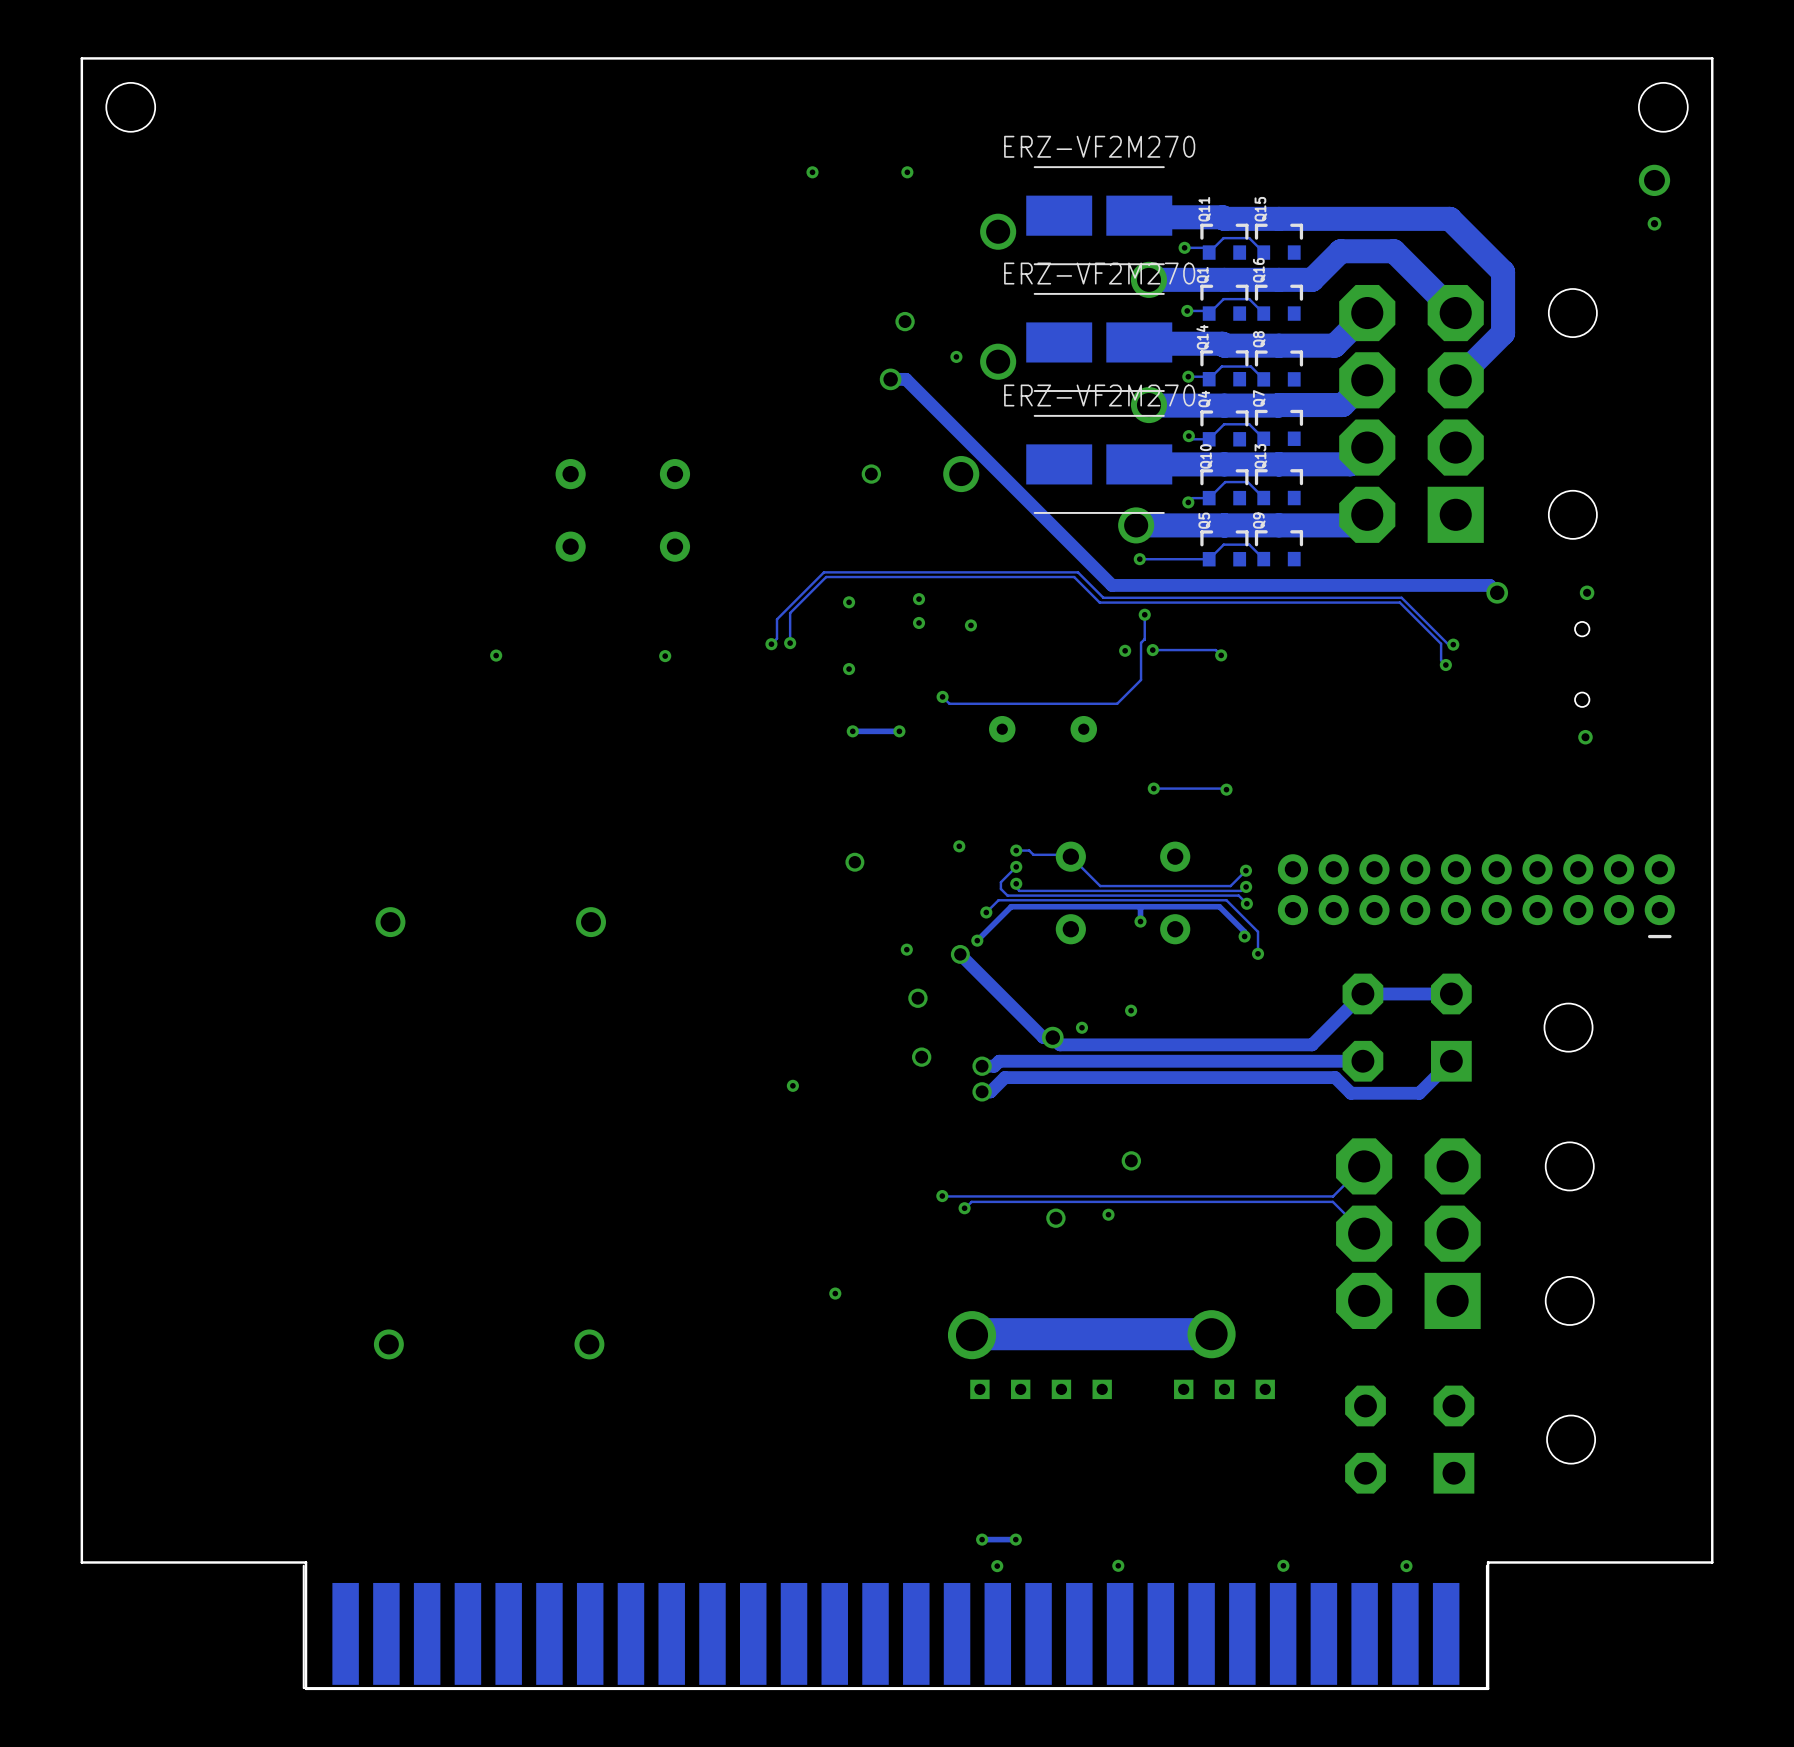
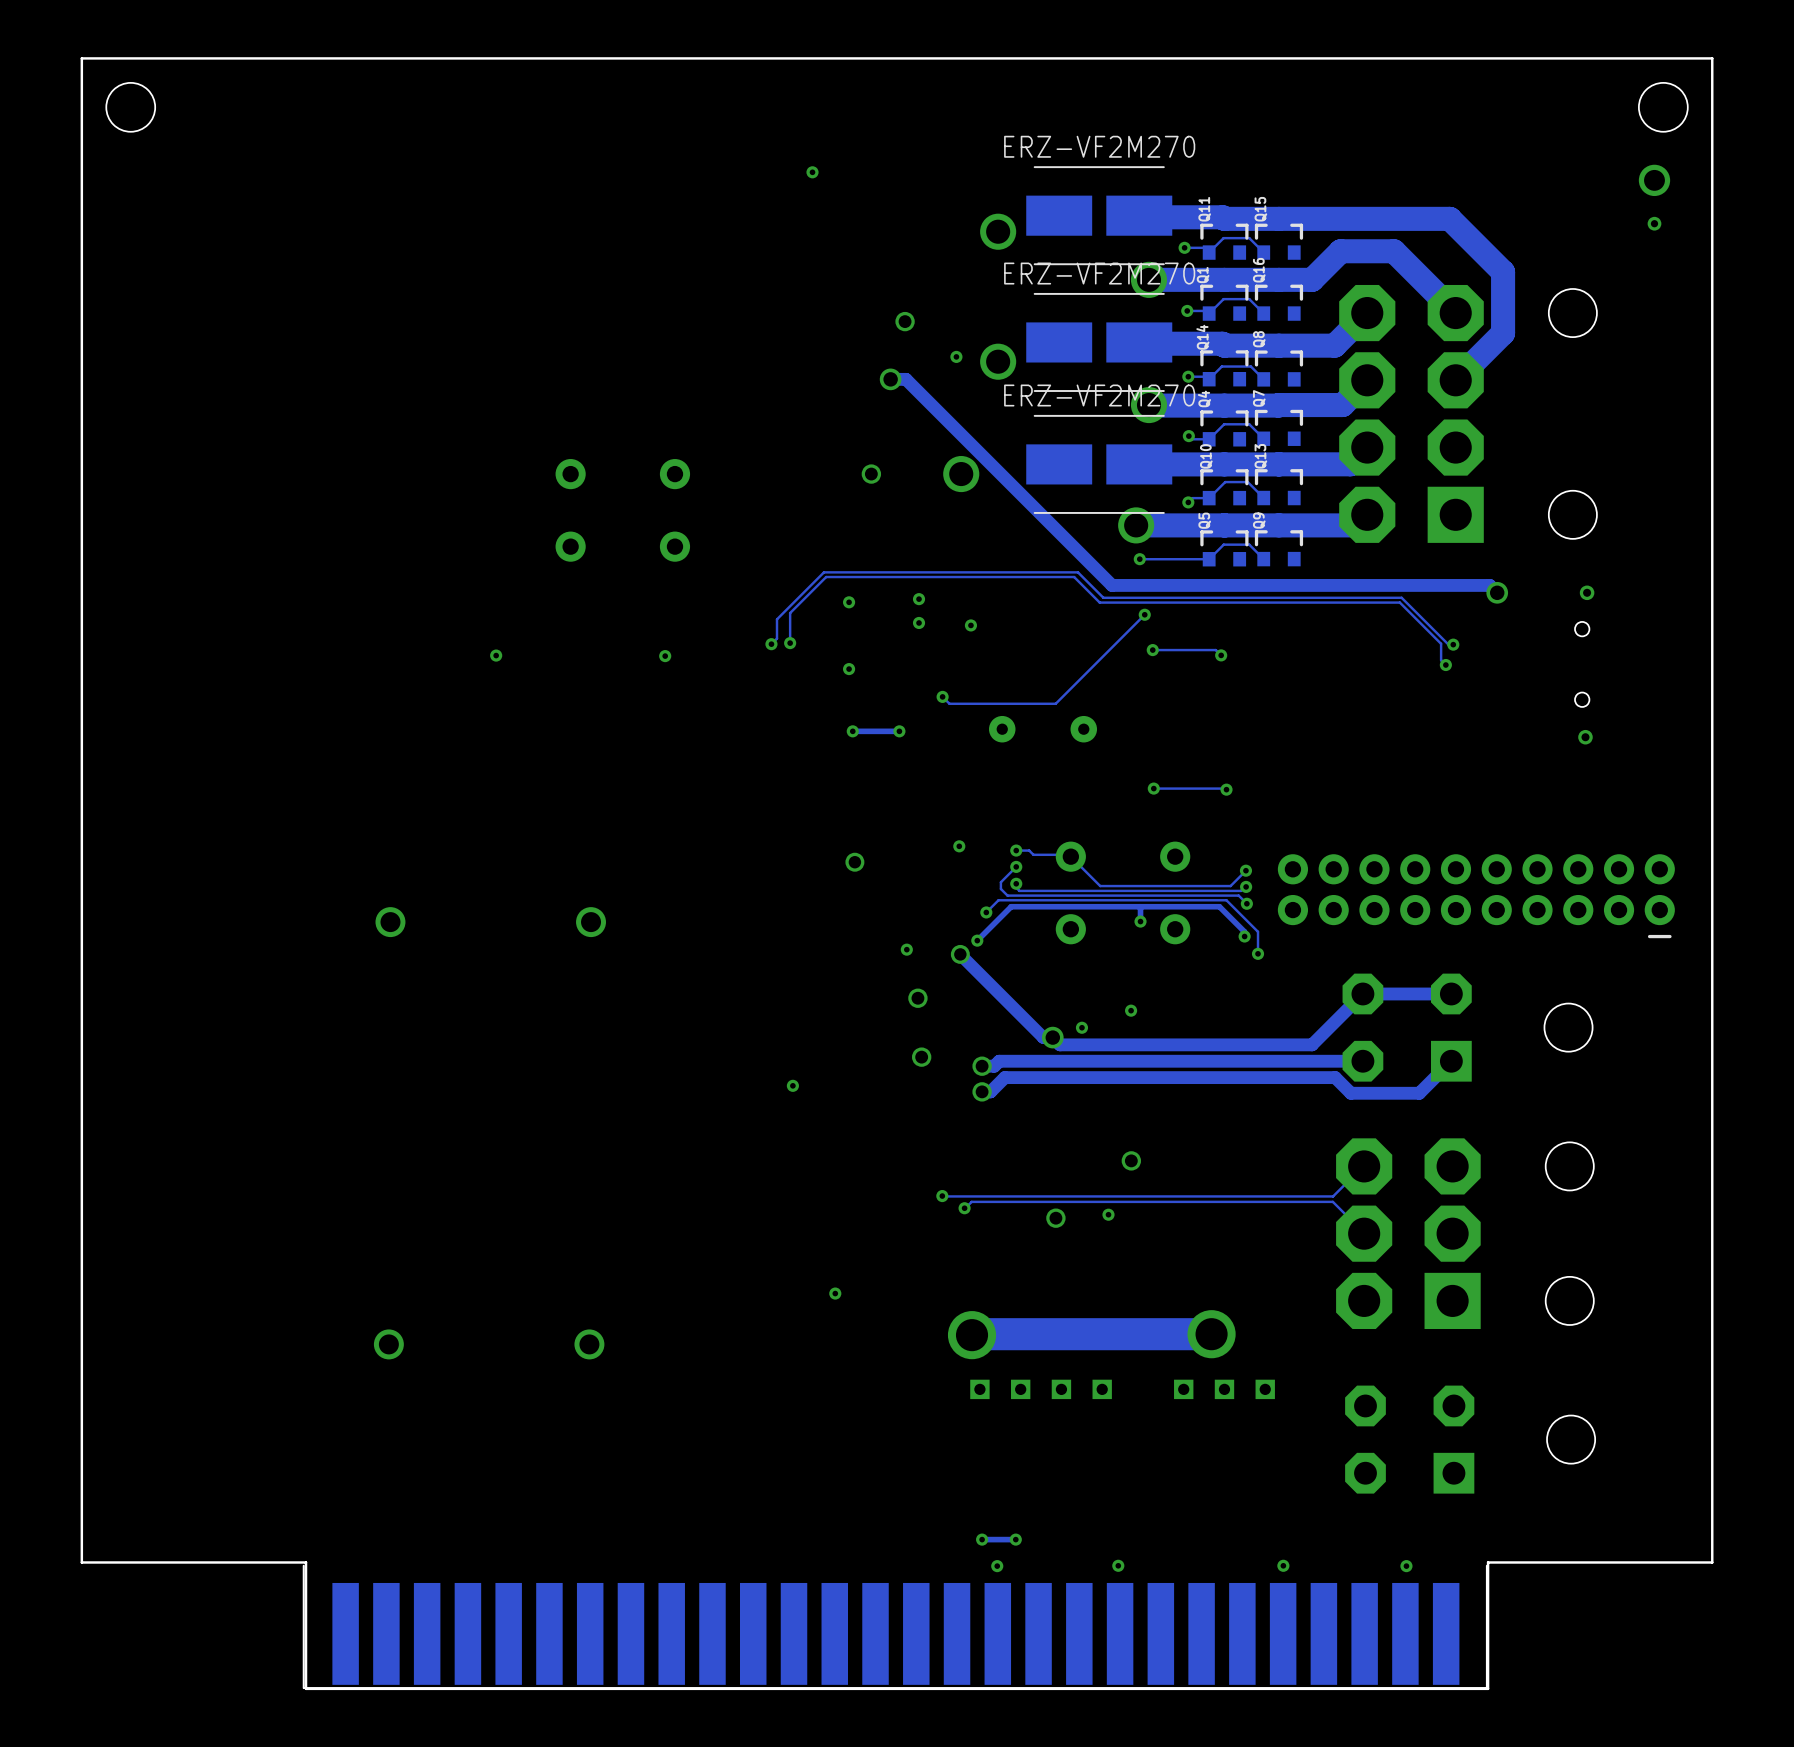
via: (907, 172) -> none
track: (1144, 614) (1144, 639) (1141, 642) (1141, 679) (1117, 703) (1055, 703) -> (1144, 614) (1055, 703)
via: (1125, 650) -> none

